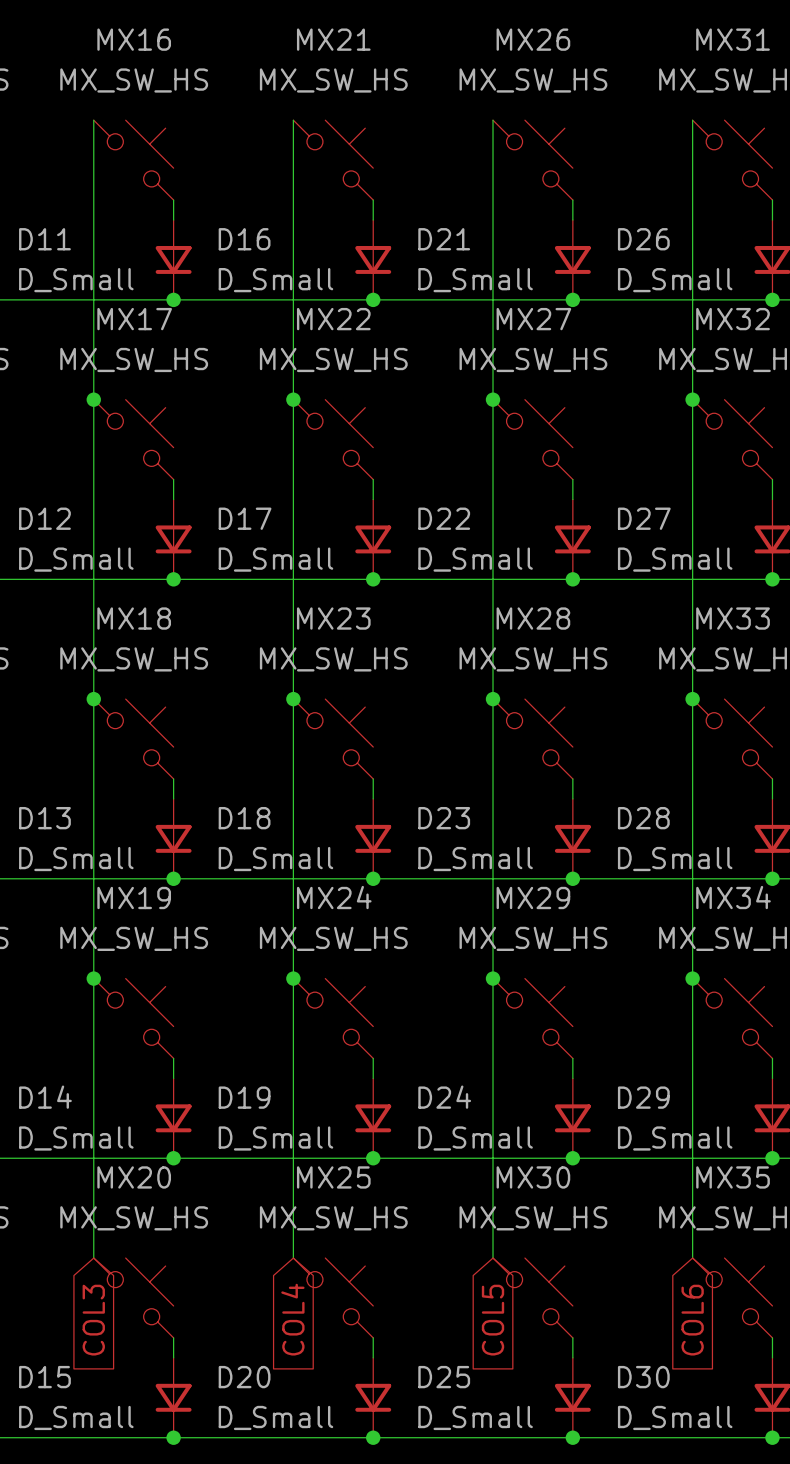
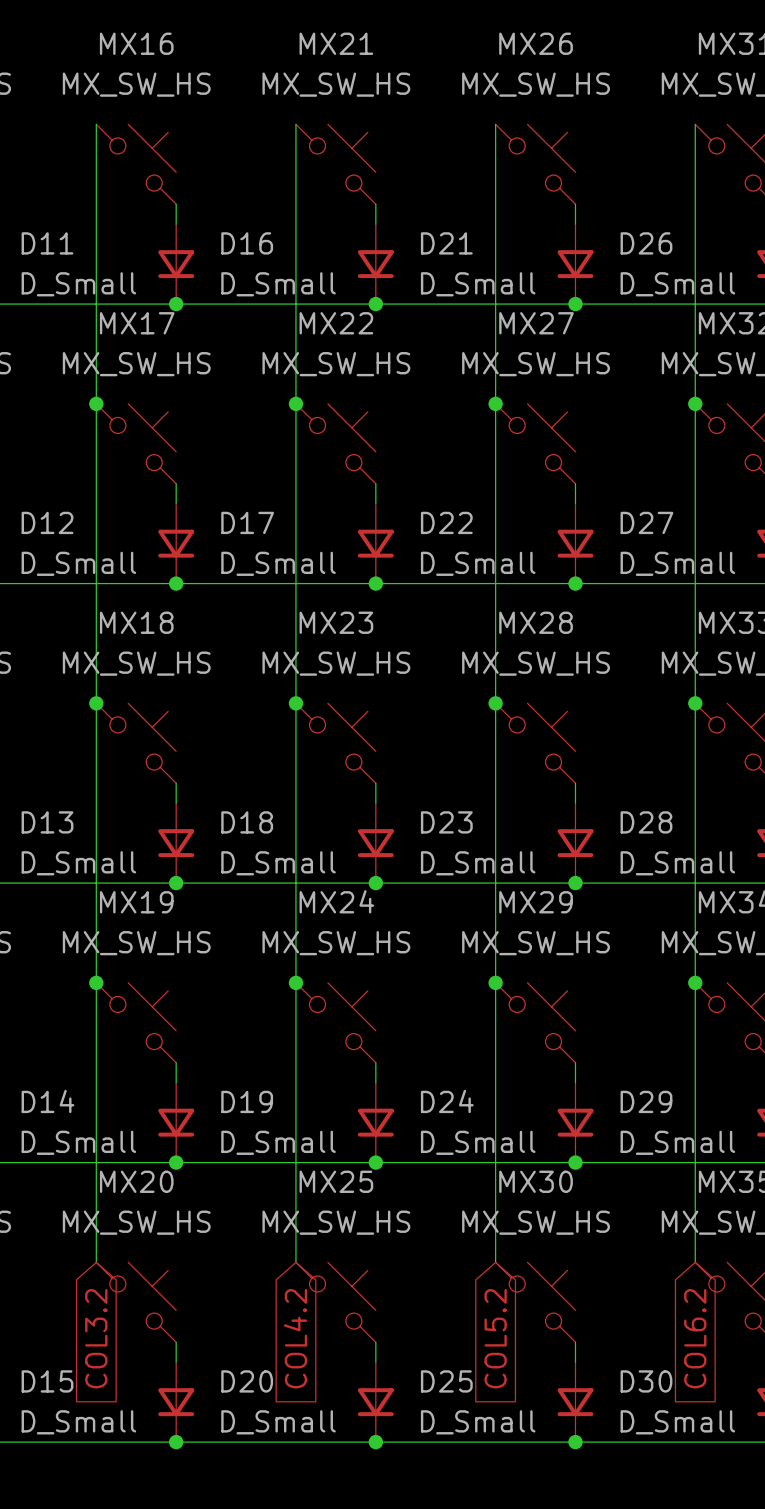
global label: COL4 (292, 1319) -> COL4.2 (295, 1338)
global label: COL3 (93, 1320) -> COL3.2 (96, 1338)
global label: COL5 (493, 1320) -> COL5.2 (495, 1338)
global label: COL6 (692, 1320) -> COL6.2 (695, 1338)

